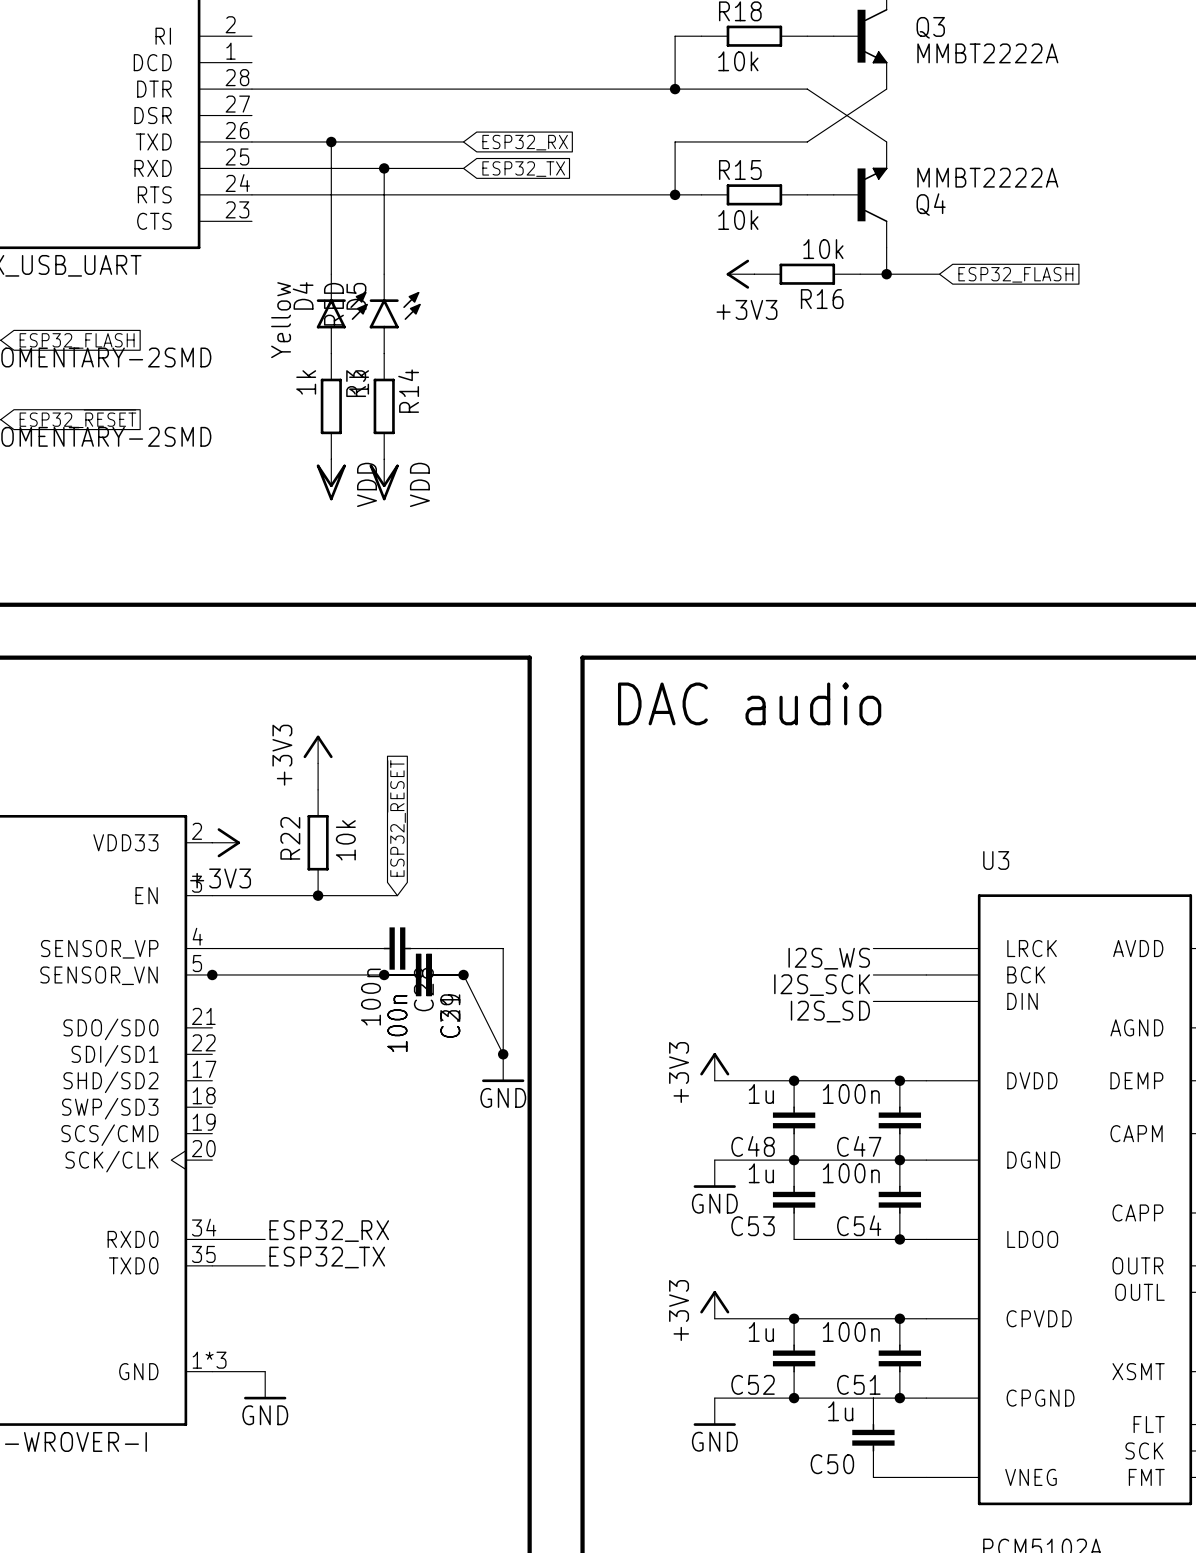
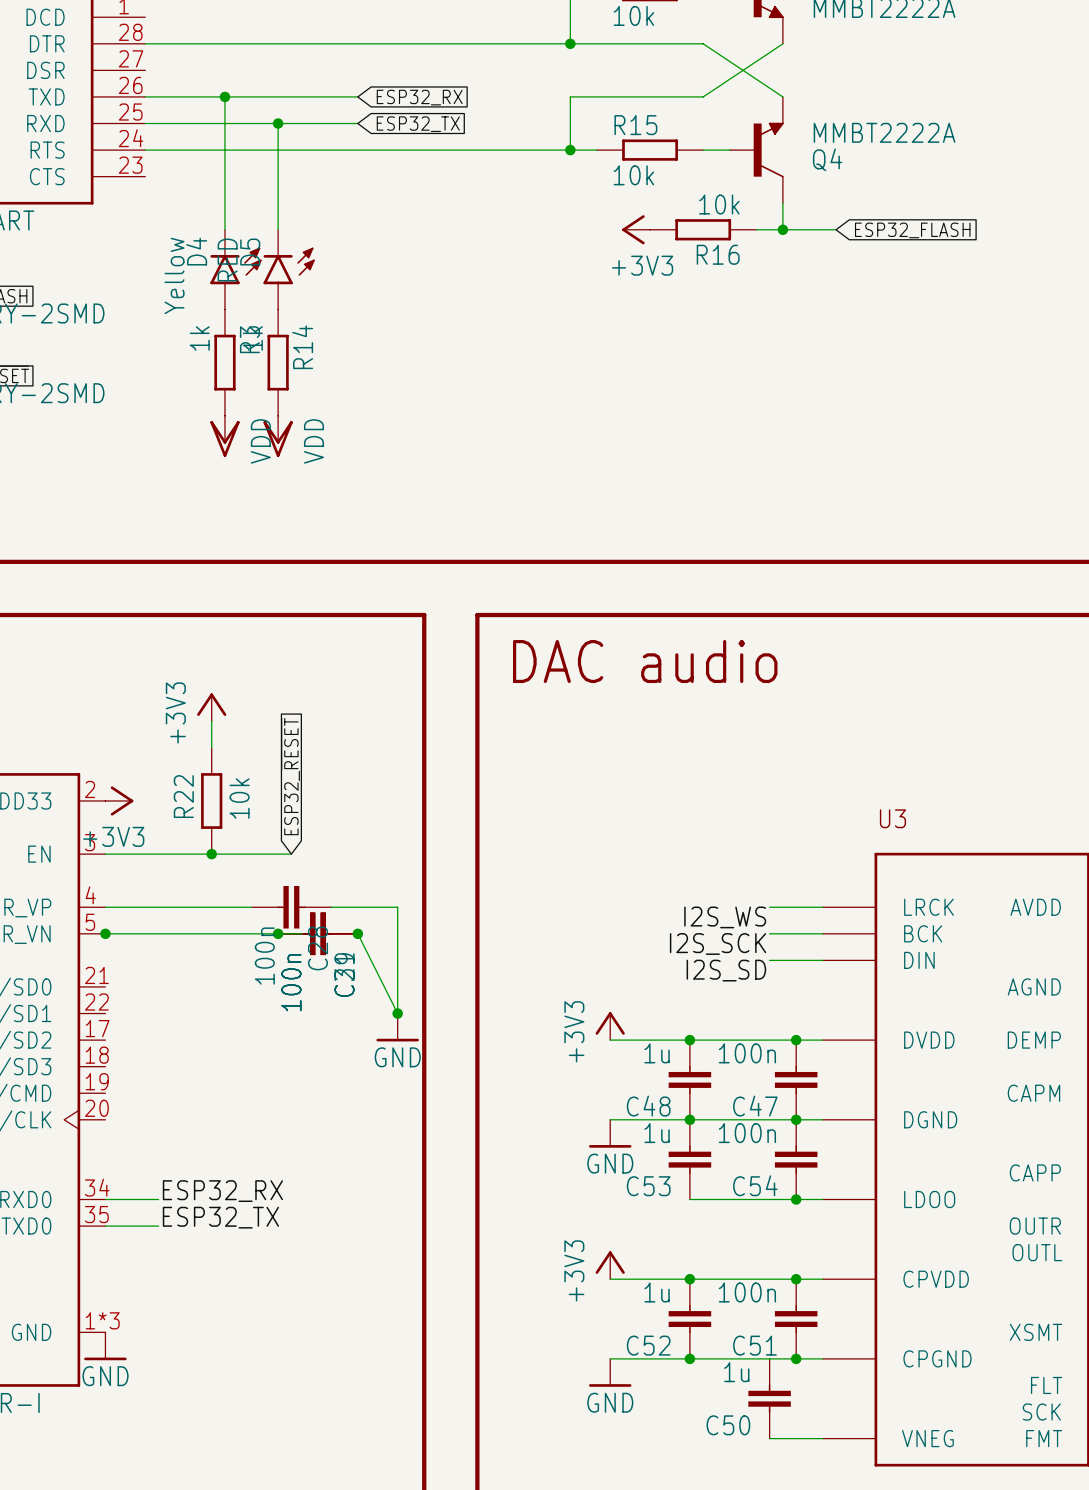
wire: (212, 1371) (265, 1371) -> none
power symbol position: GND (265, 1385) -> GND (105, 1346)

